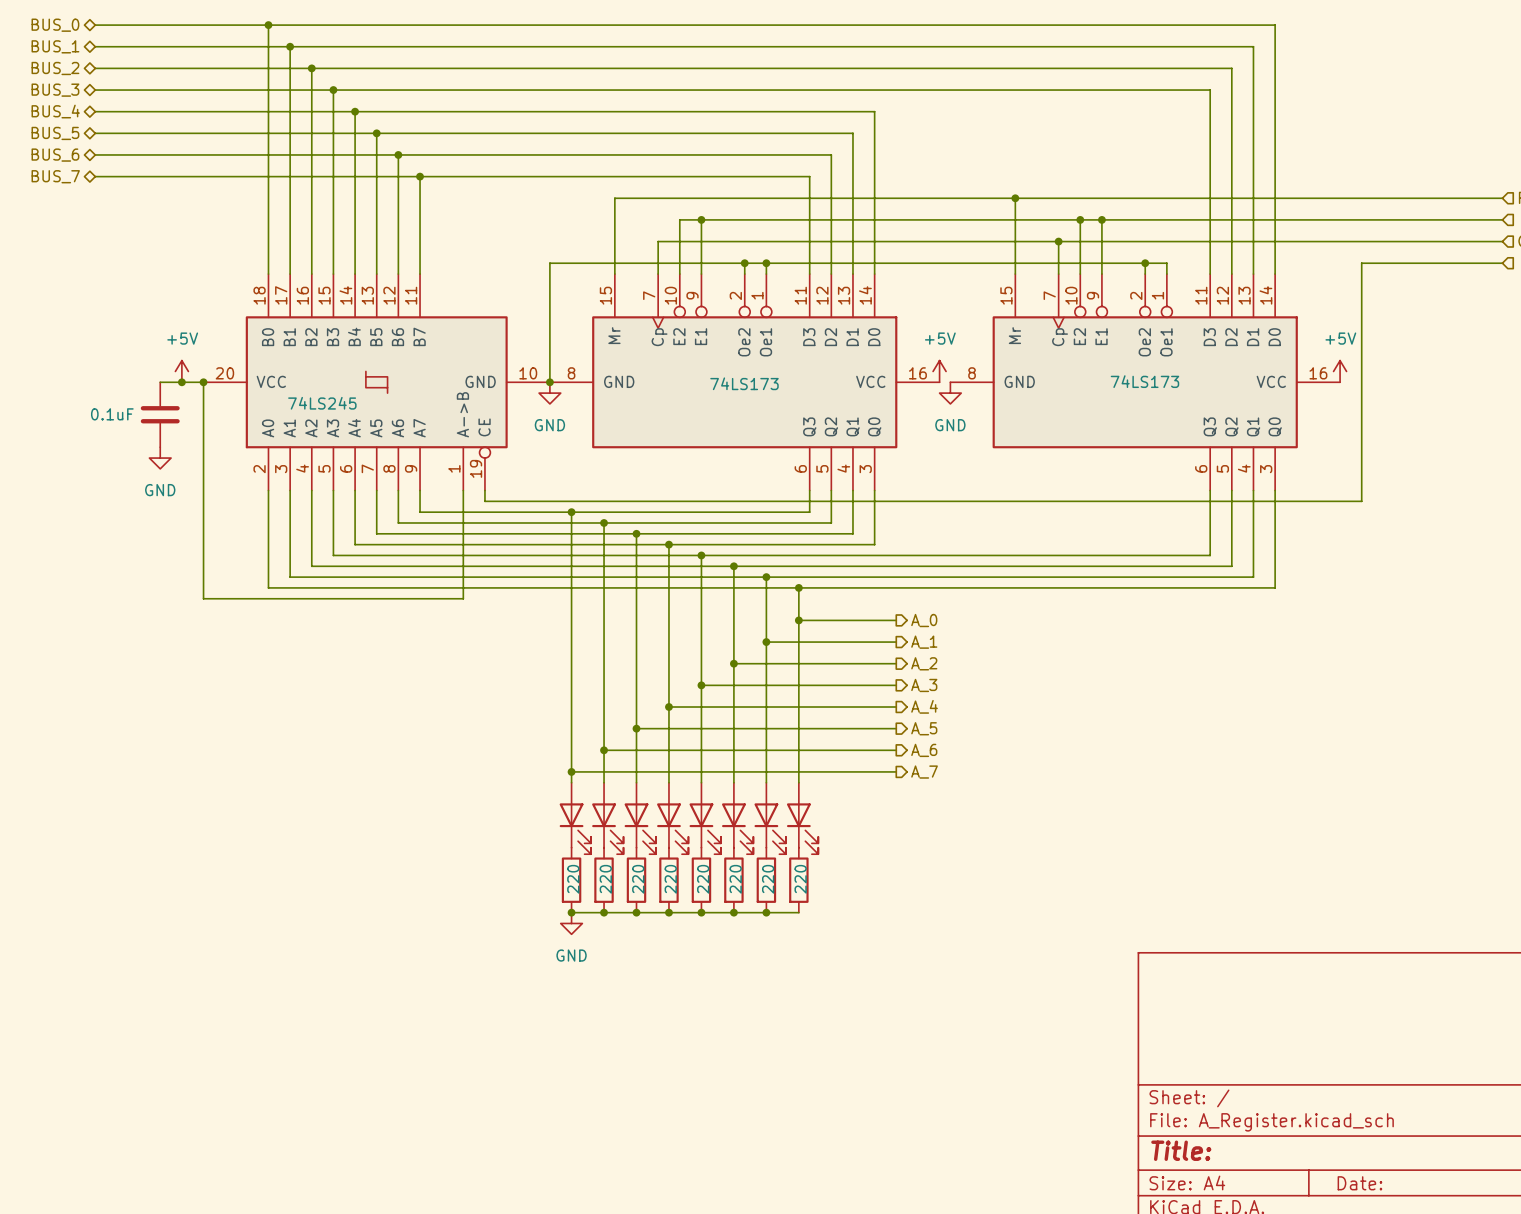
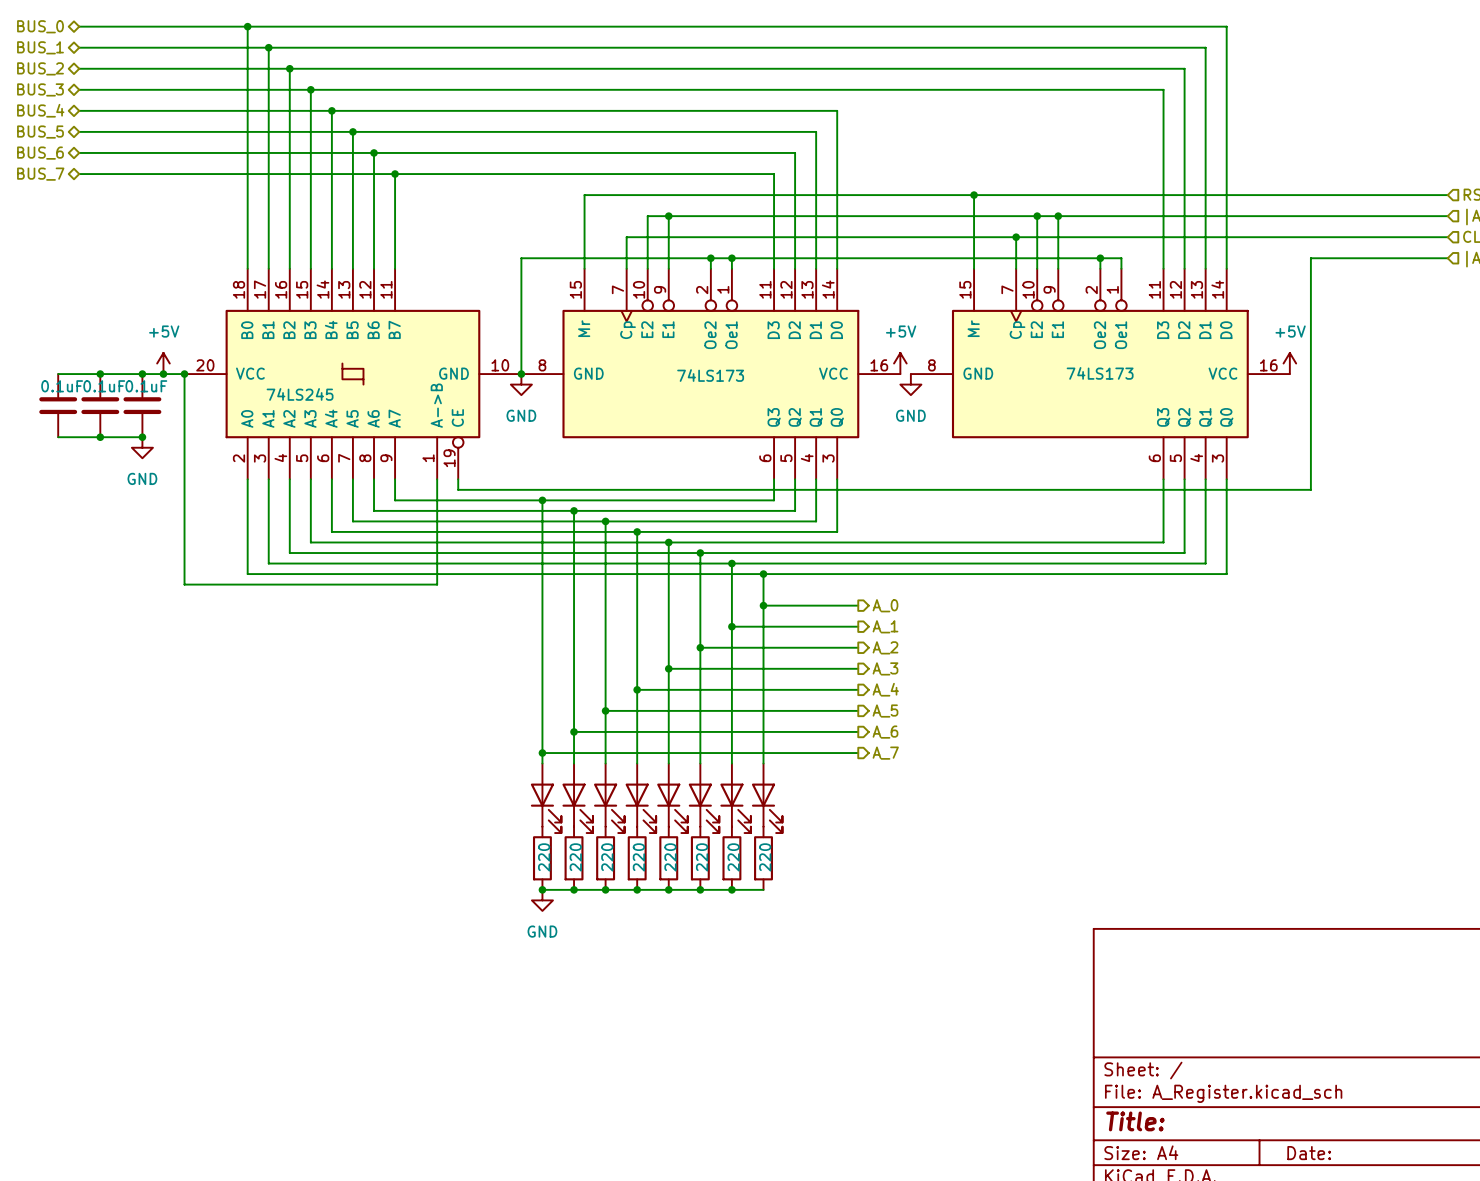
wire: none -> (58, 374) (142, 374)
junction: none -> (100, 374)
junction: none -> (142, 374)
part: none -> 0.1uF (58, 405)
part value position: 0.1uF (112, 414) -> 0.1uF (146, 386)
part: none -> 0.1uF (100, 405)
wire: none -> (58, 437) (142, 437)
junction: none -> (100, 437)
junction: none -> (142, 437)

